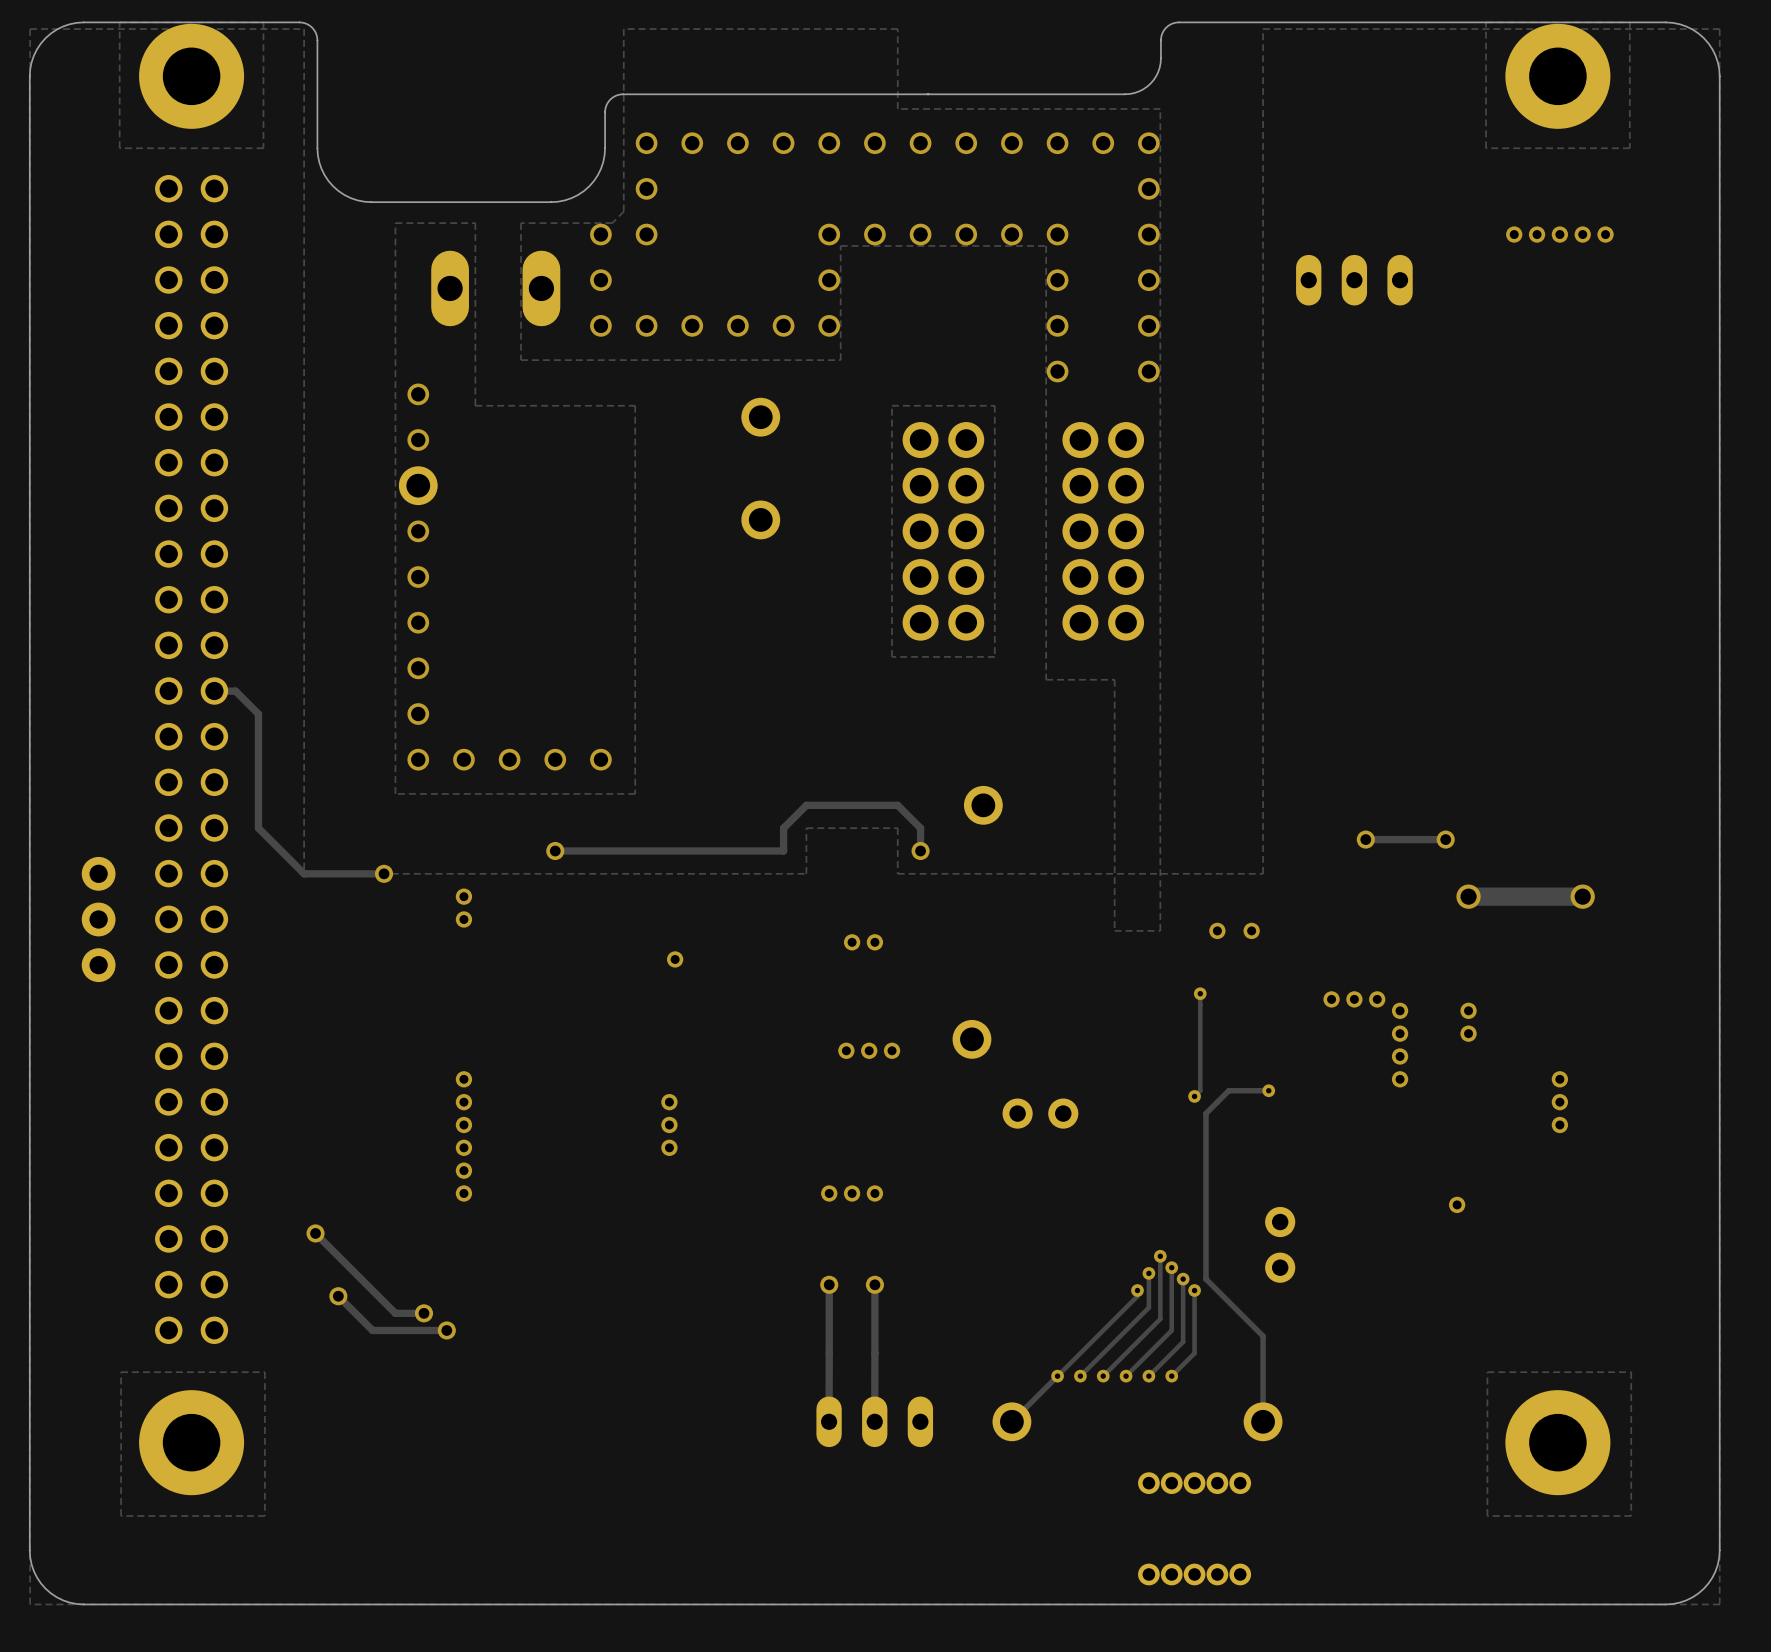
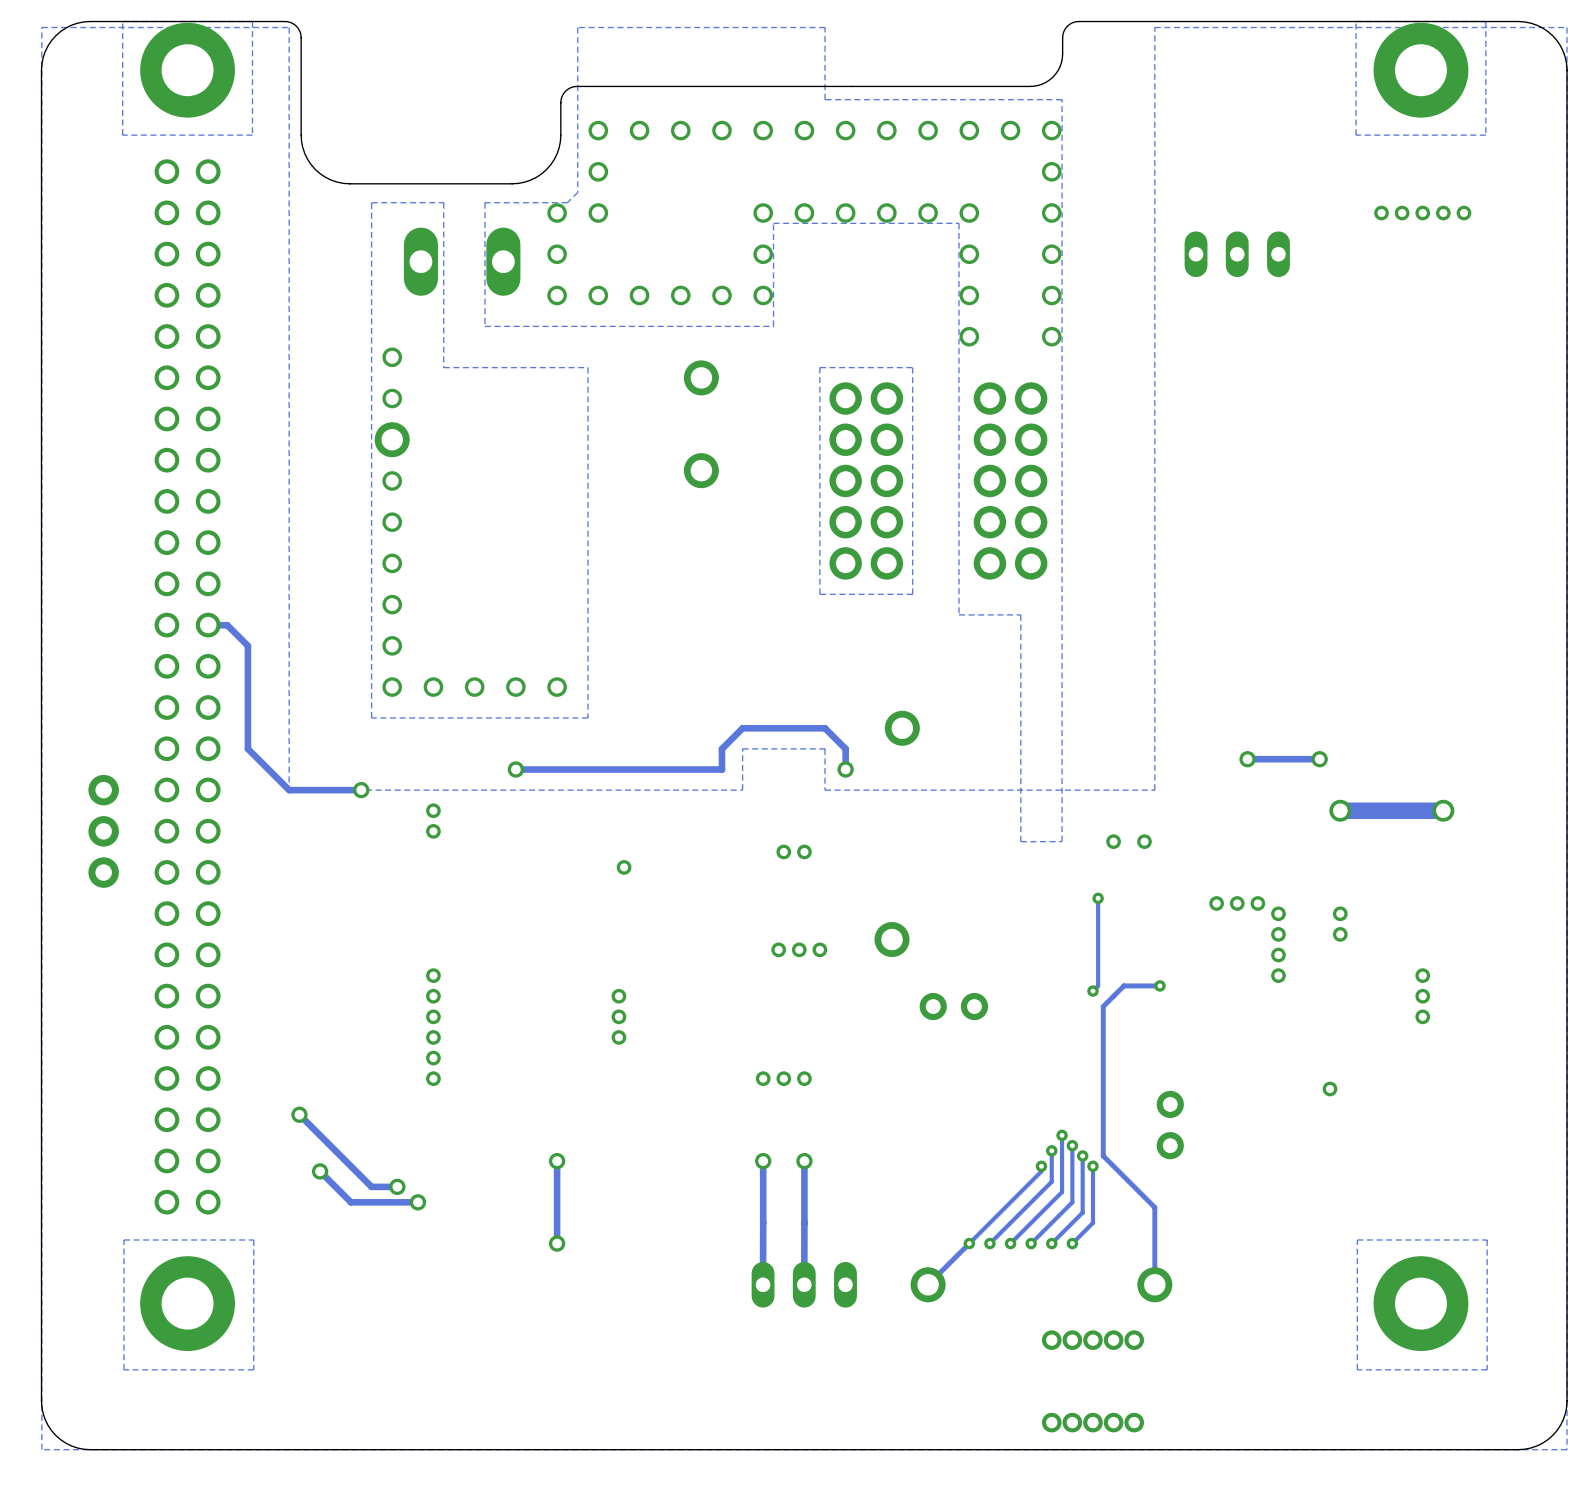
track: none -> (557, 1161) (557, 1243)
via: none -> (557, 1161)
via: none -> (557, 1243)

